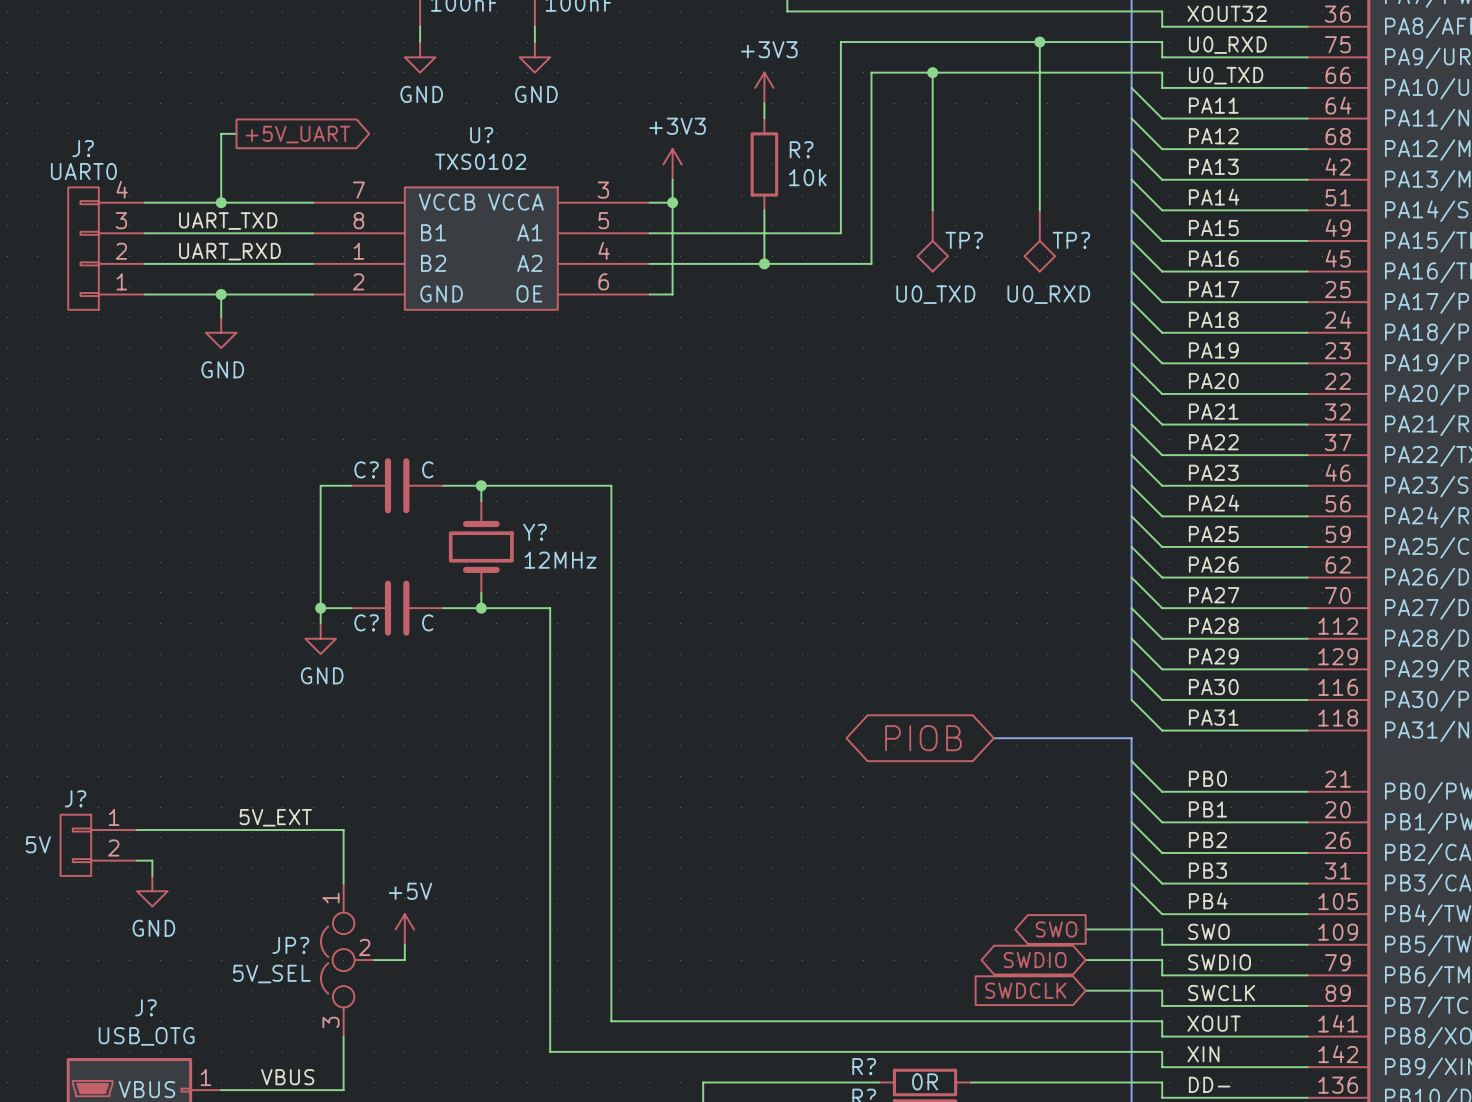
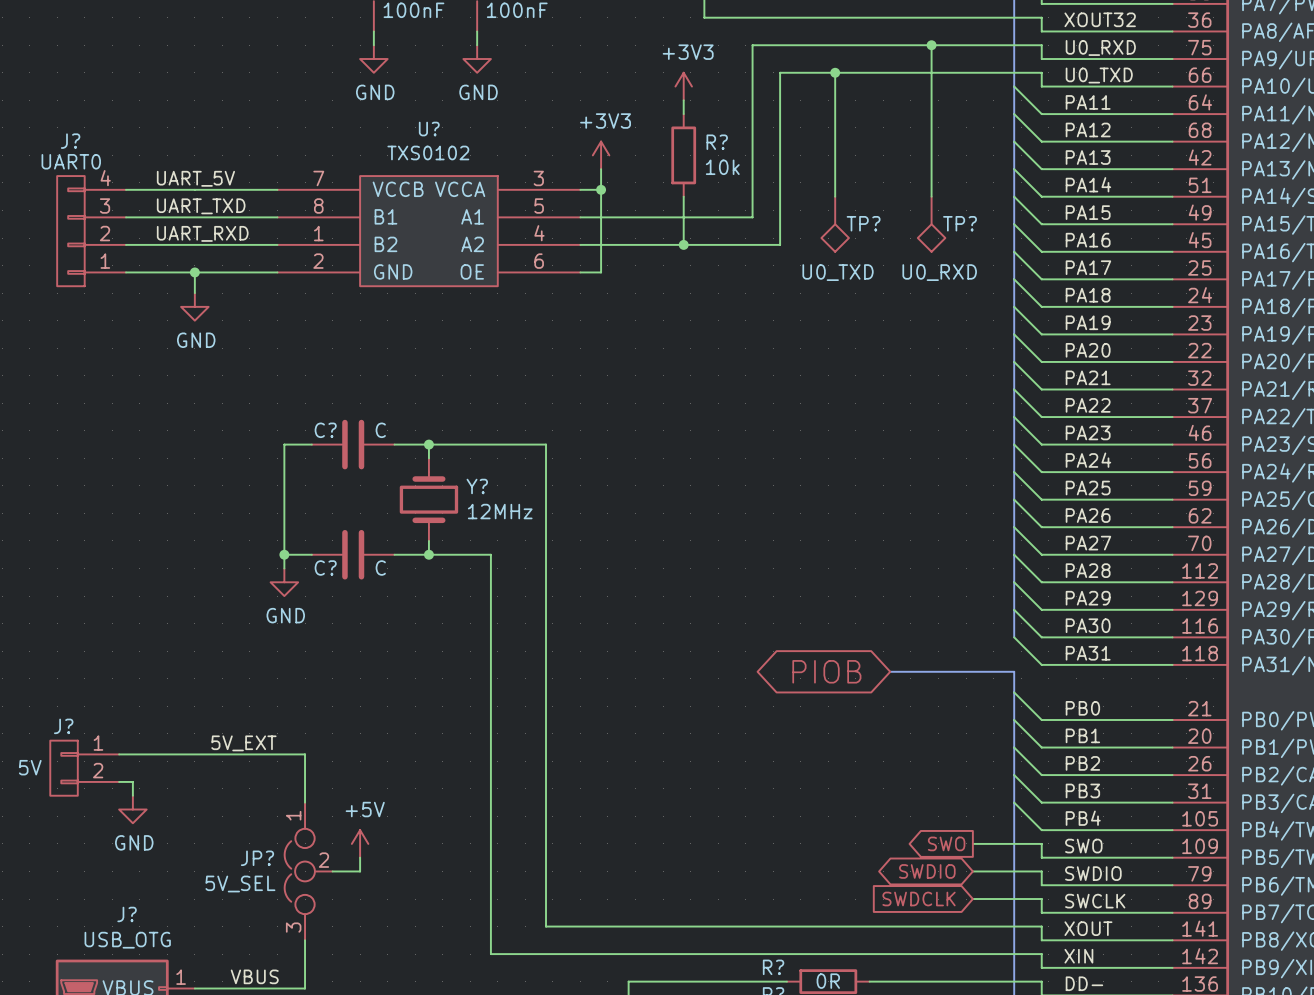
wire: (236, 133) (221, 133) (221, 202) -> none
global label: +5V_UART (297, 134) -> none
label: none -> UART_5V (195, 178)
junction: (221, 202) -> none

